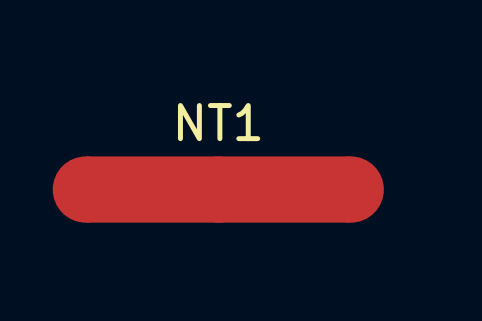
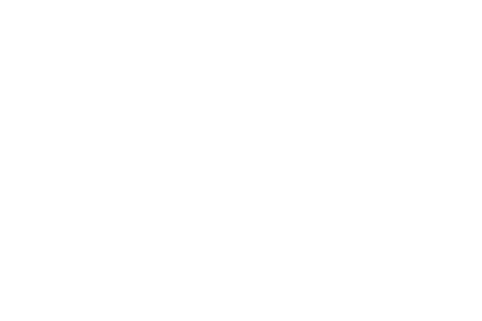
NT1: (218, 189) -> none

